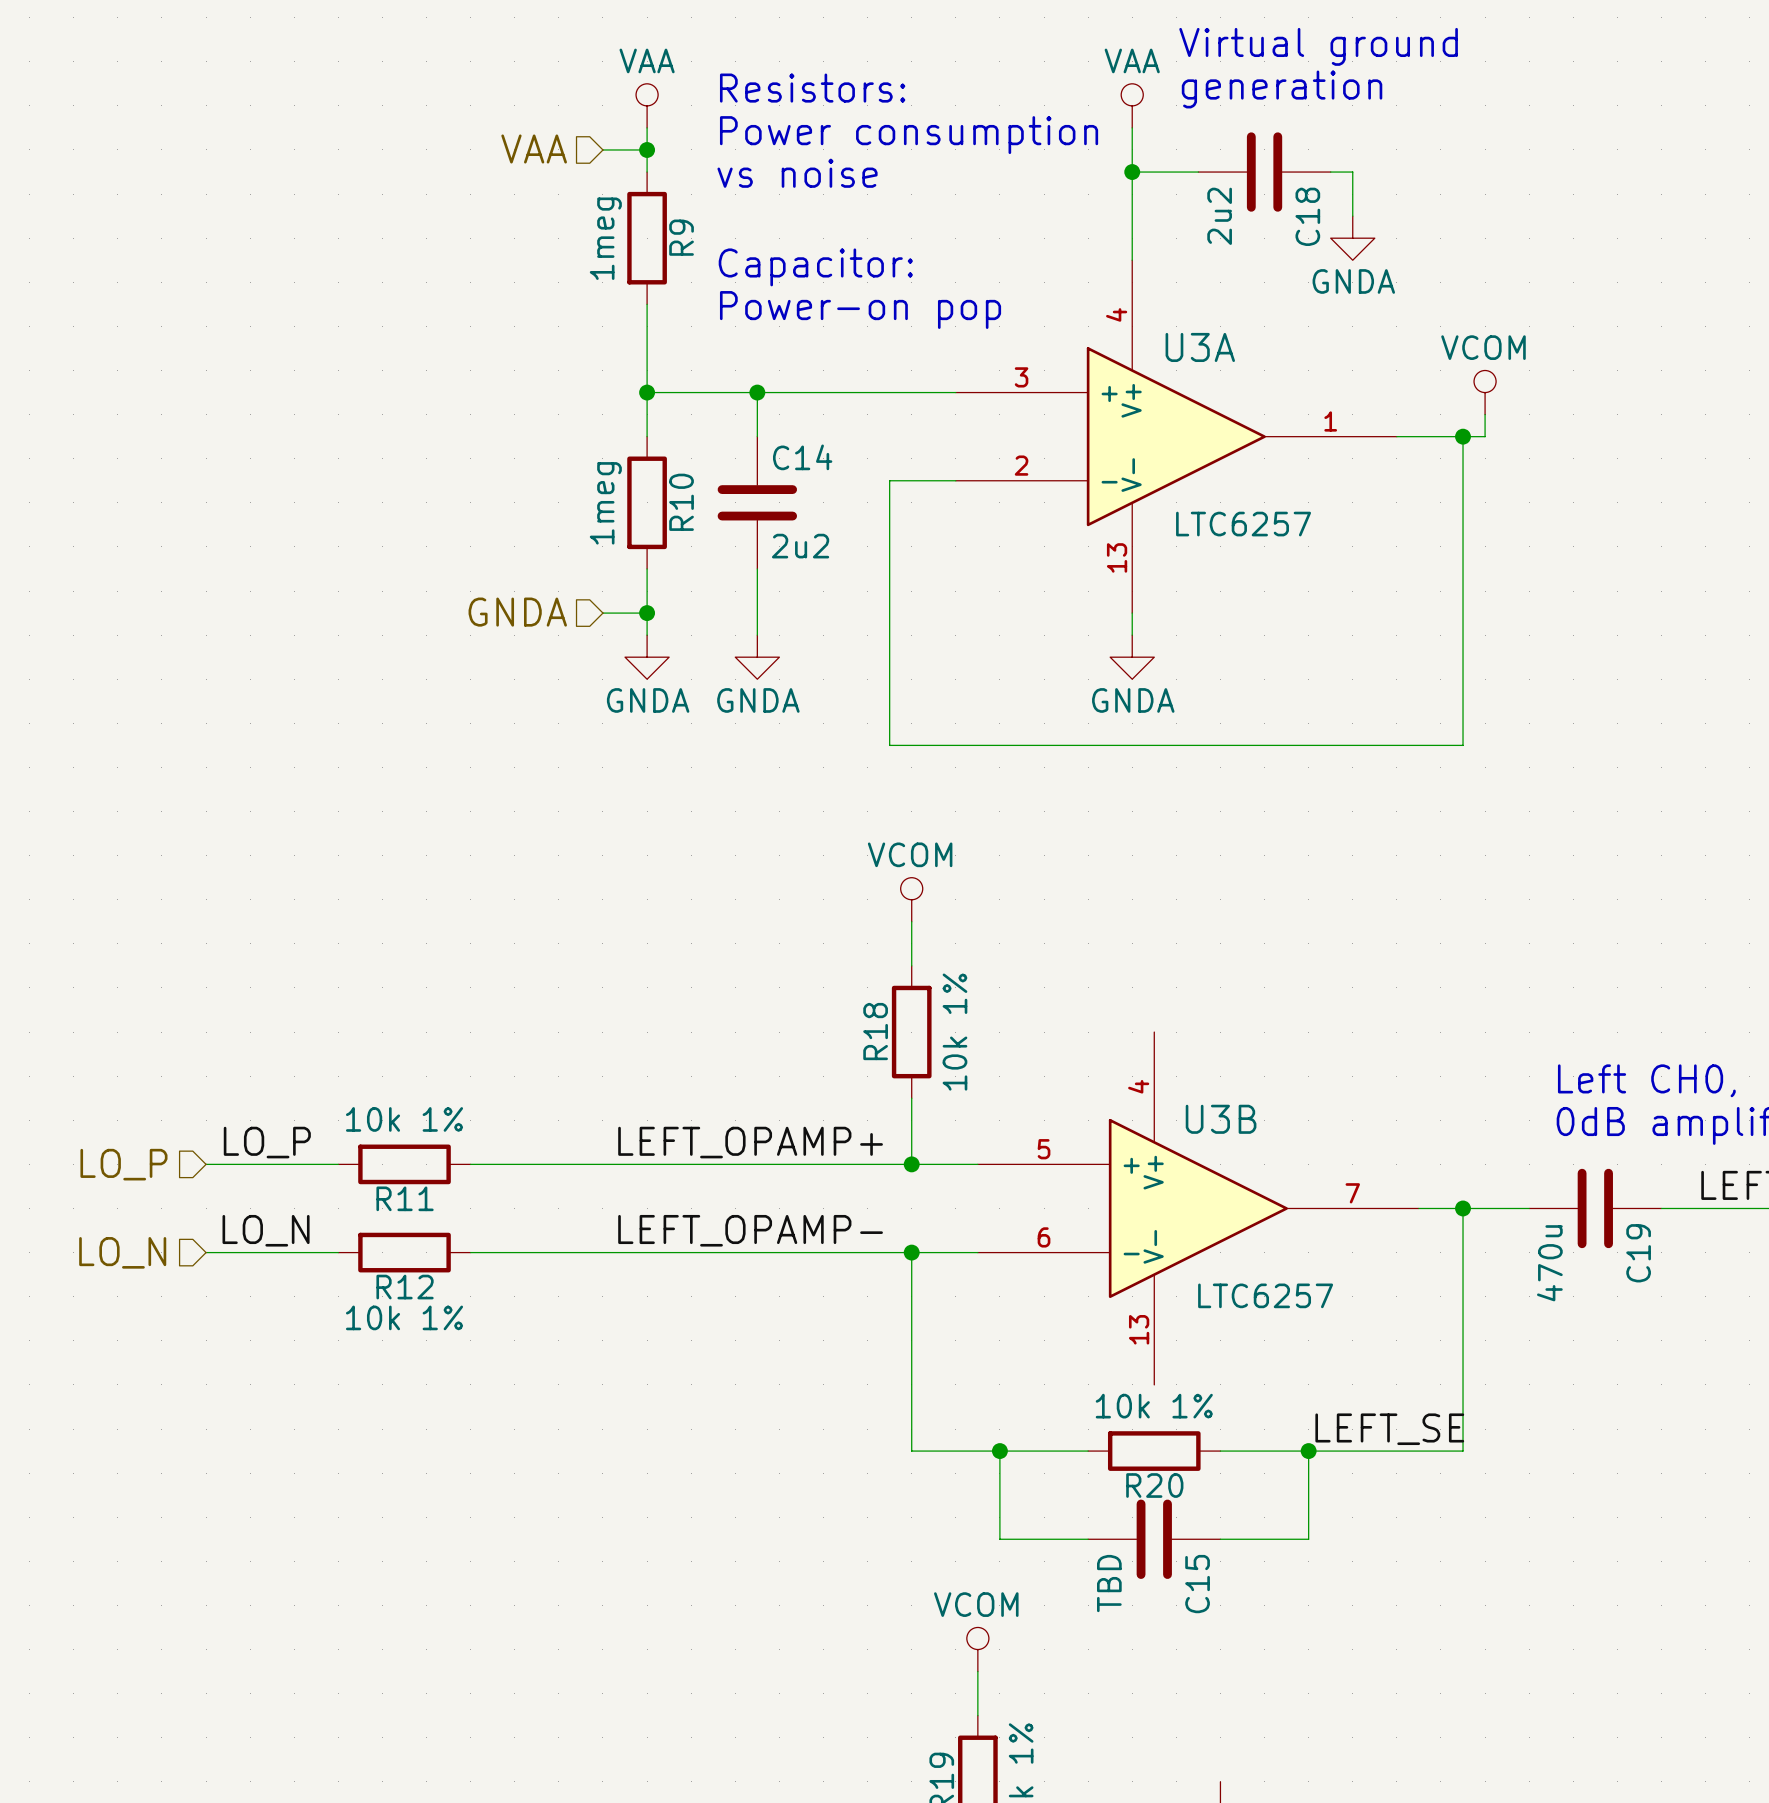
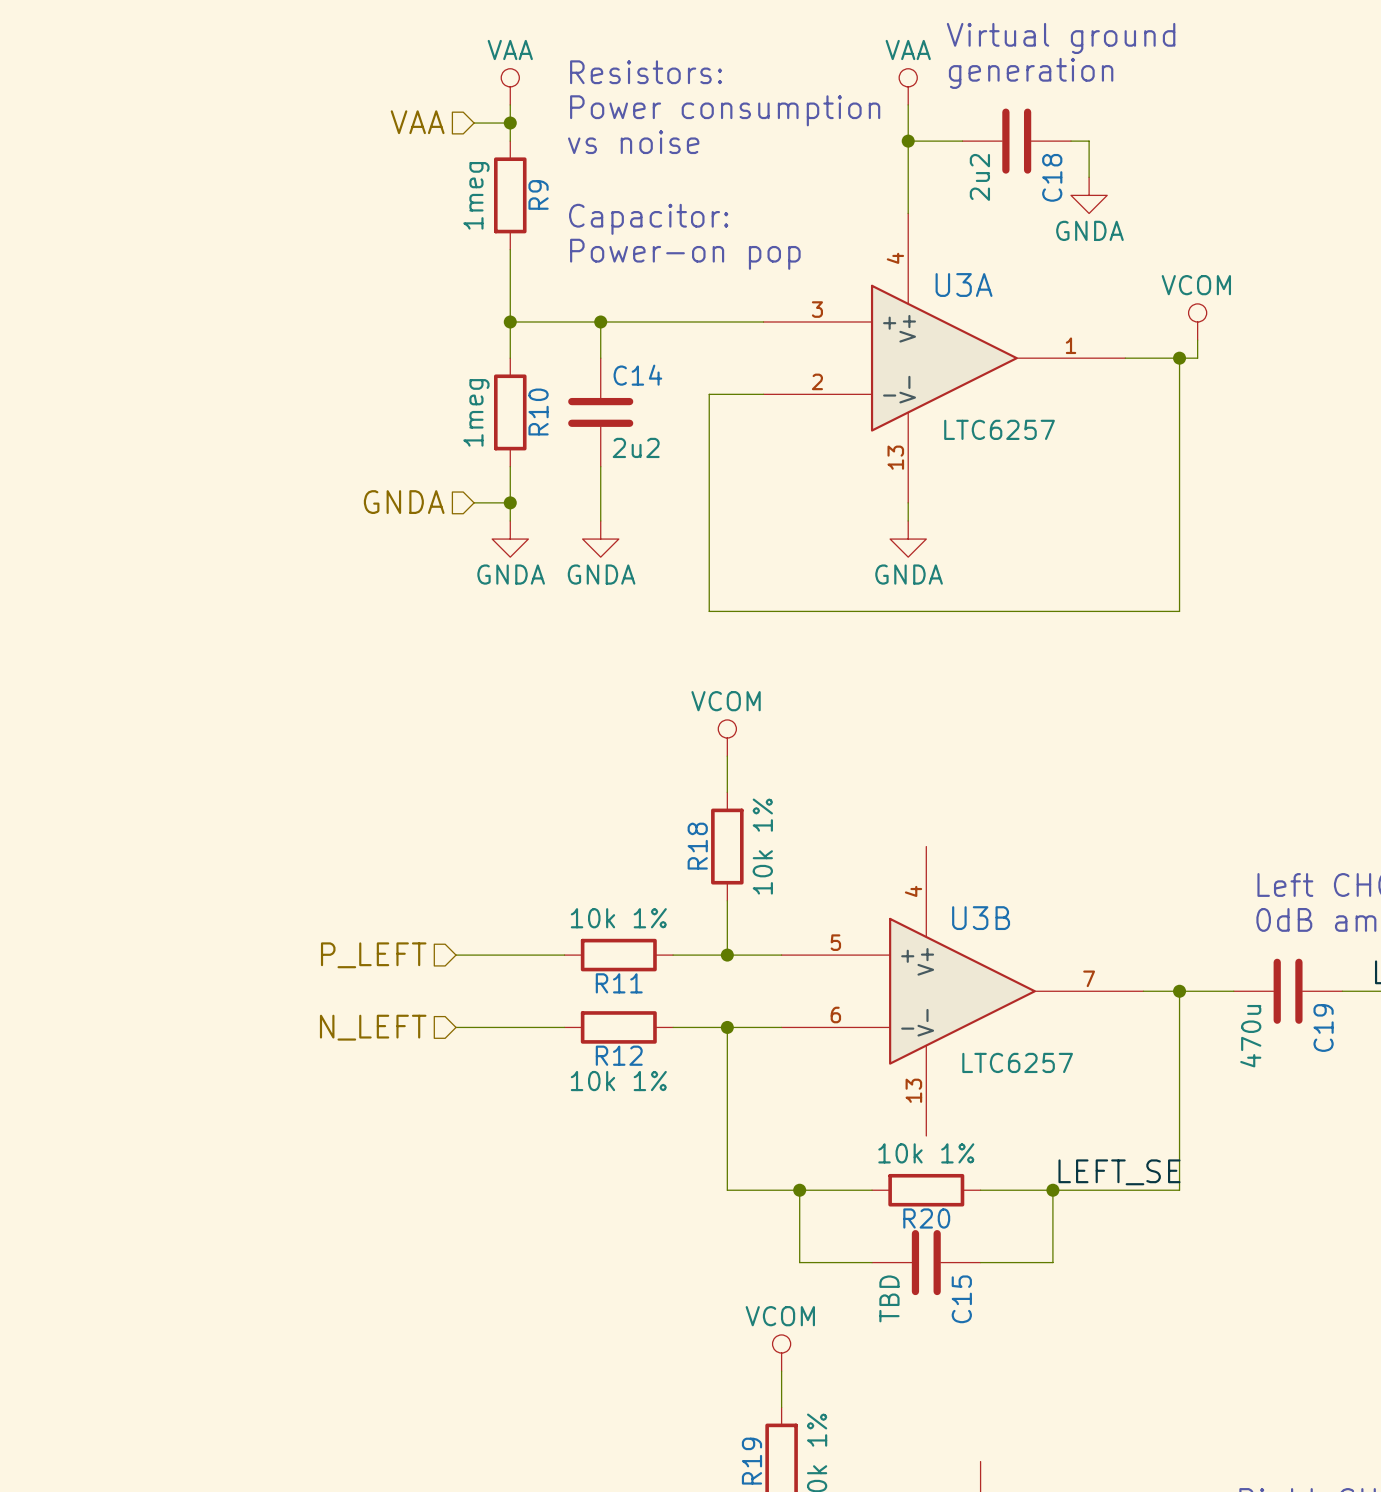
label: LO_P (267, 1142) -> none
label: LEFT_OPAMP+ (750, 1142) -> none
hierarchical label: LO_P (123, 1164) -> none
wire: (206, 1164) (338, 1164) -> none
R11 position: (404, 1164) -> (618, 955)
wire: (470, 1164) (580, 1164) -> none
hierarchical label: none -> P_LEFT (373, 955)
wire: (713, 1164) (845, 1164) -> none
label: LO_N (266, 1230) -> none
label: LEFT_OPAMP- (750, 1230) -> none
hierarchical label: LO_N (122, 1252) -> none
wire: (206, 1252) (338, 1252) -> none
R12 position: (404, 1252) -> (618, 1027)
wire: (470, 1252) (580, 1252) -> none
hierarchical label: none -> N_LEFT (373, 1027)
wire: (713, 1252) (845, 1252) -> none

